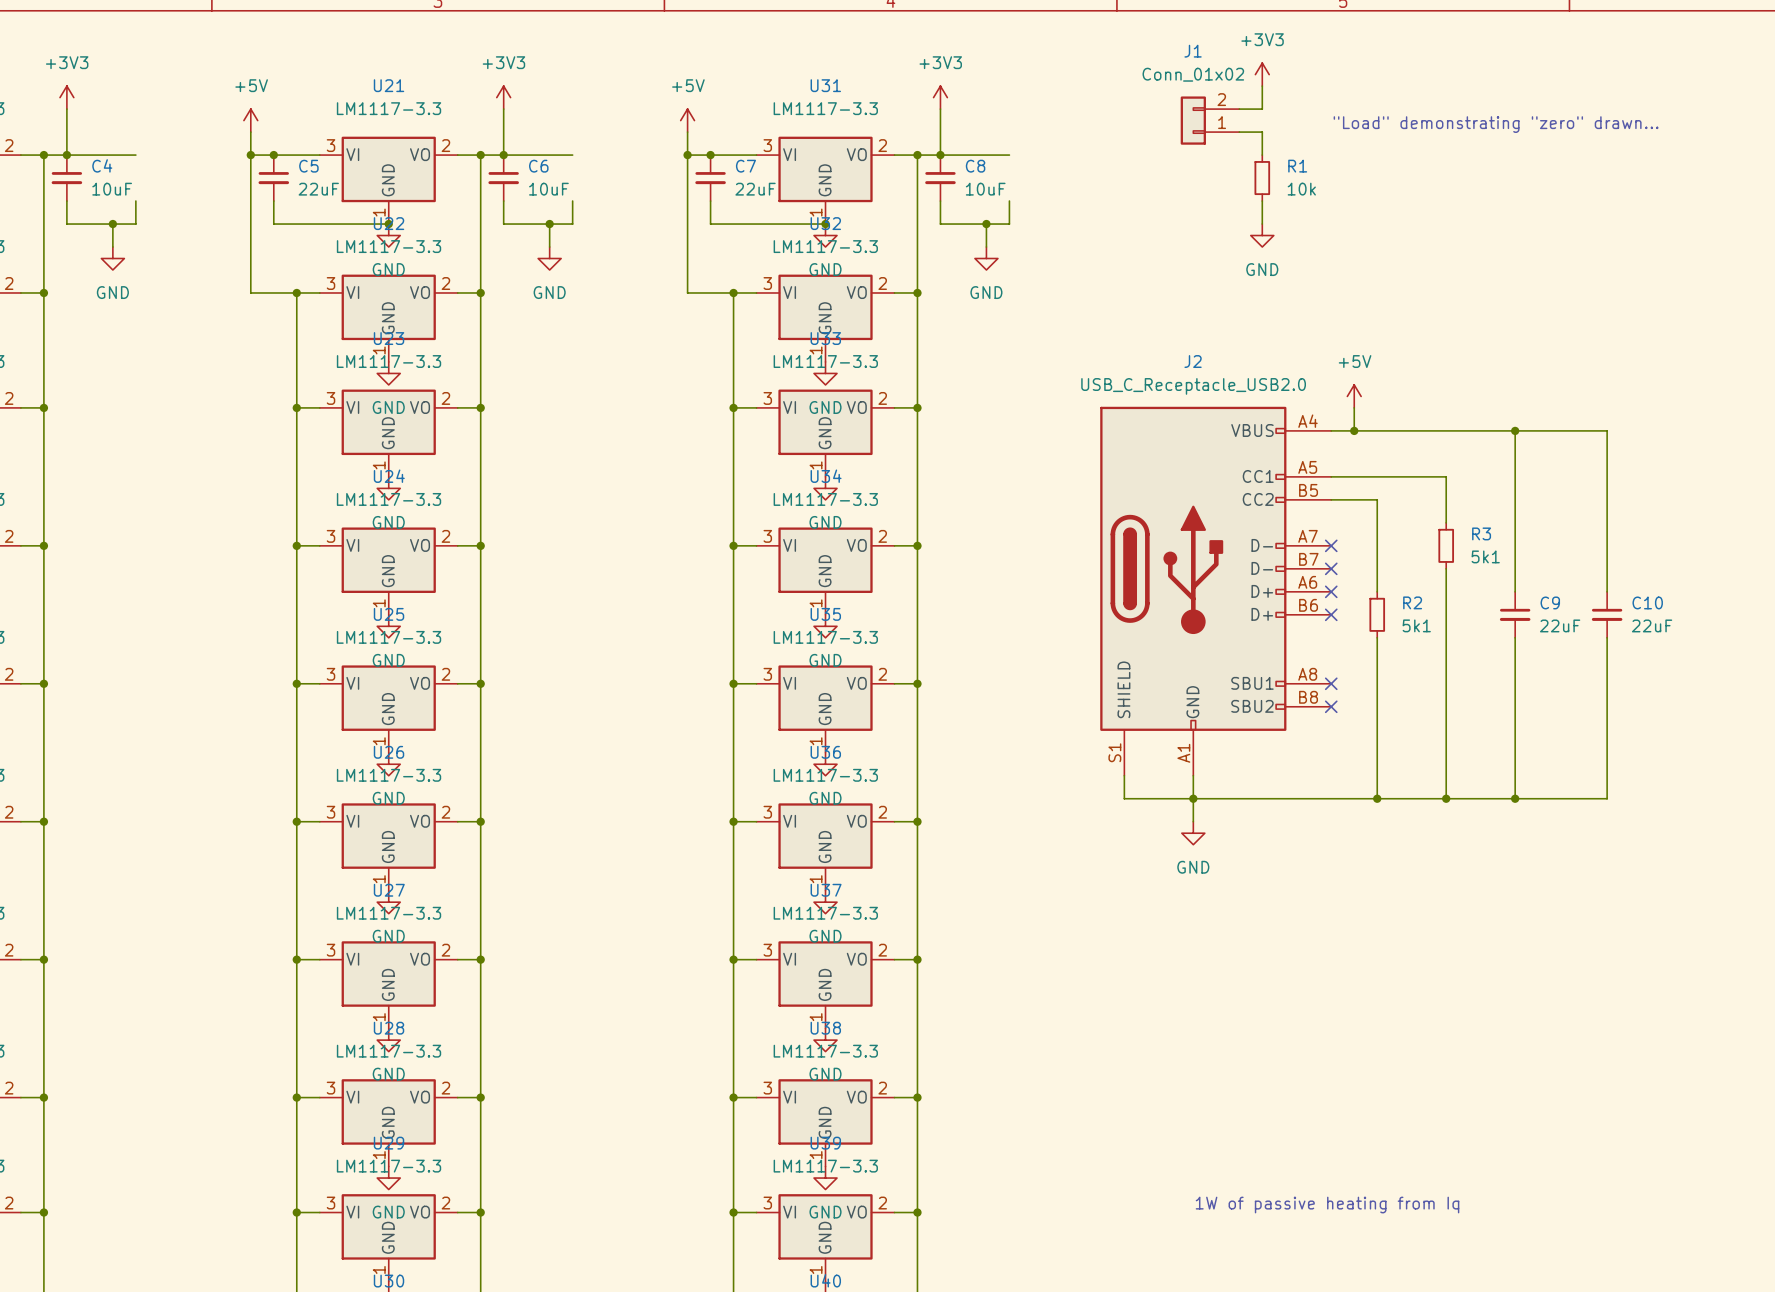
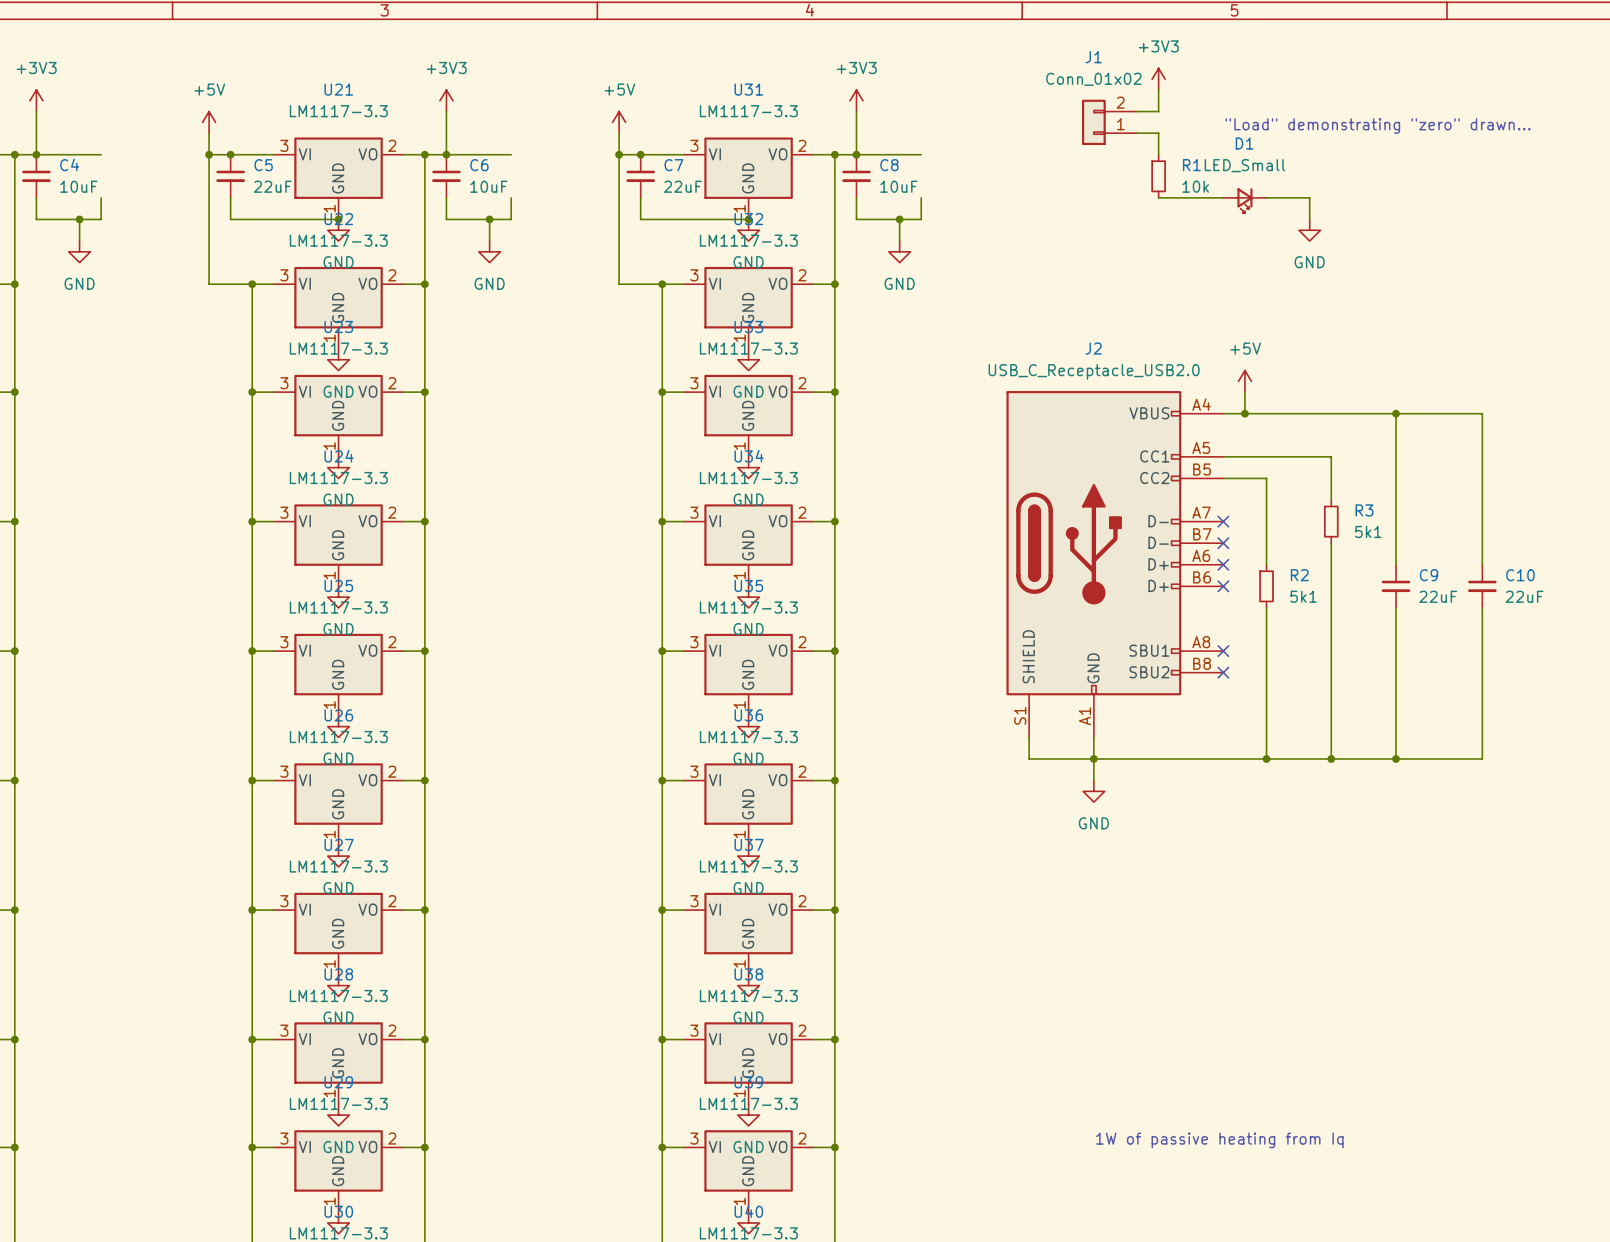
wire: (1262, 201) (1262, 224) -> (1158, 197) (1223, 197)
wire: none -> (1266, 197) (1309, 197) (1309, 219)
D1: none -> LED_Small (1244, 200)
power symbol position: GND (1262, 235) -> GND (1309, 230)

